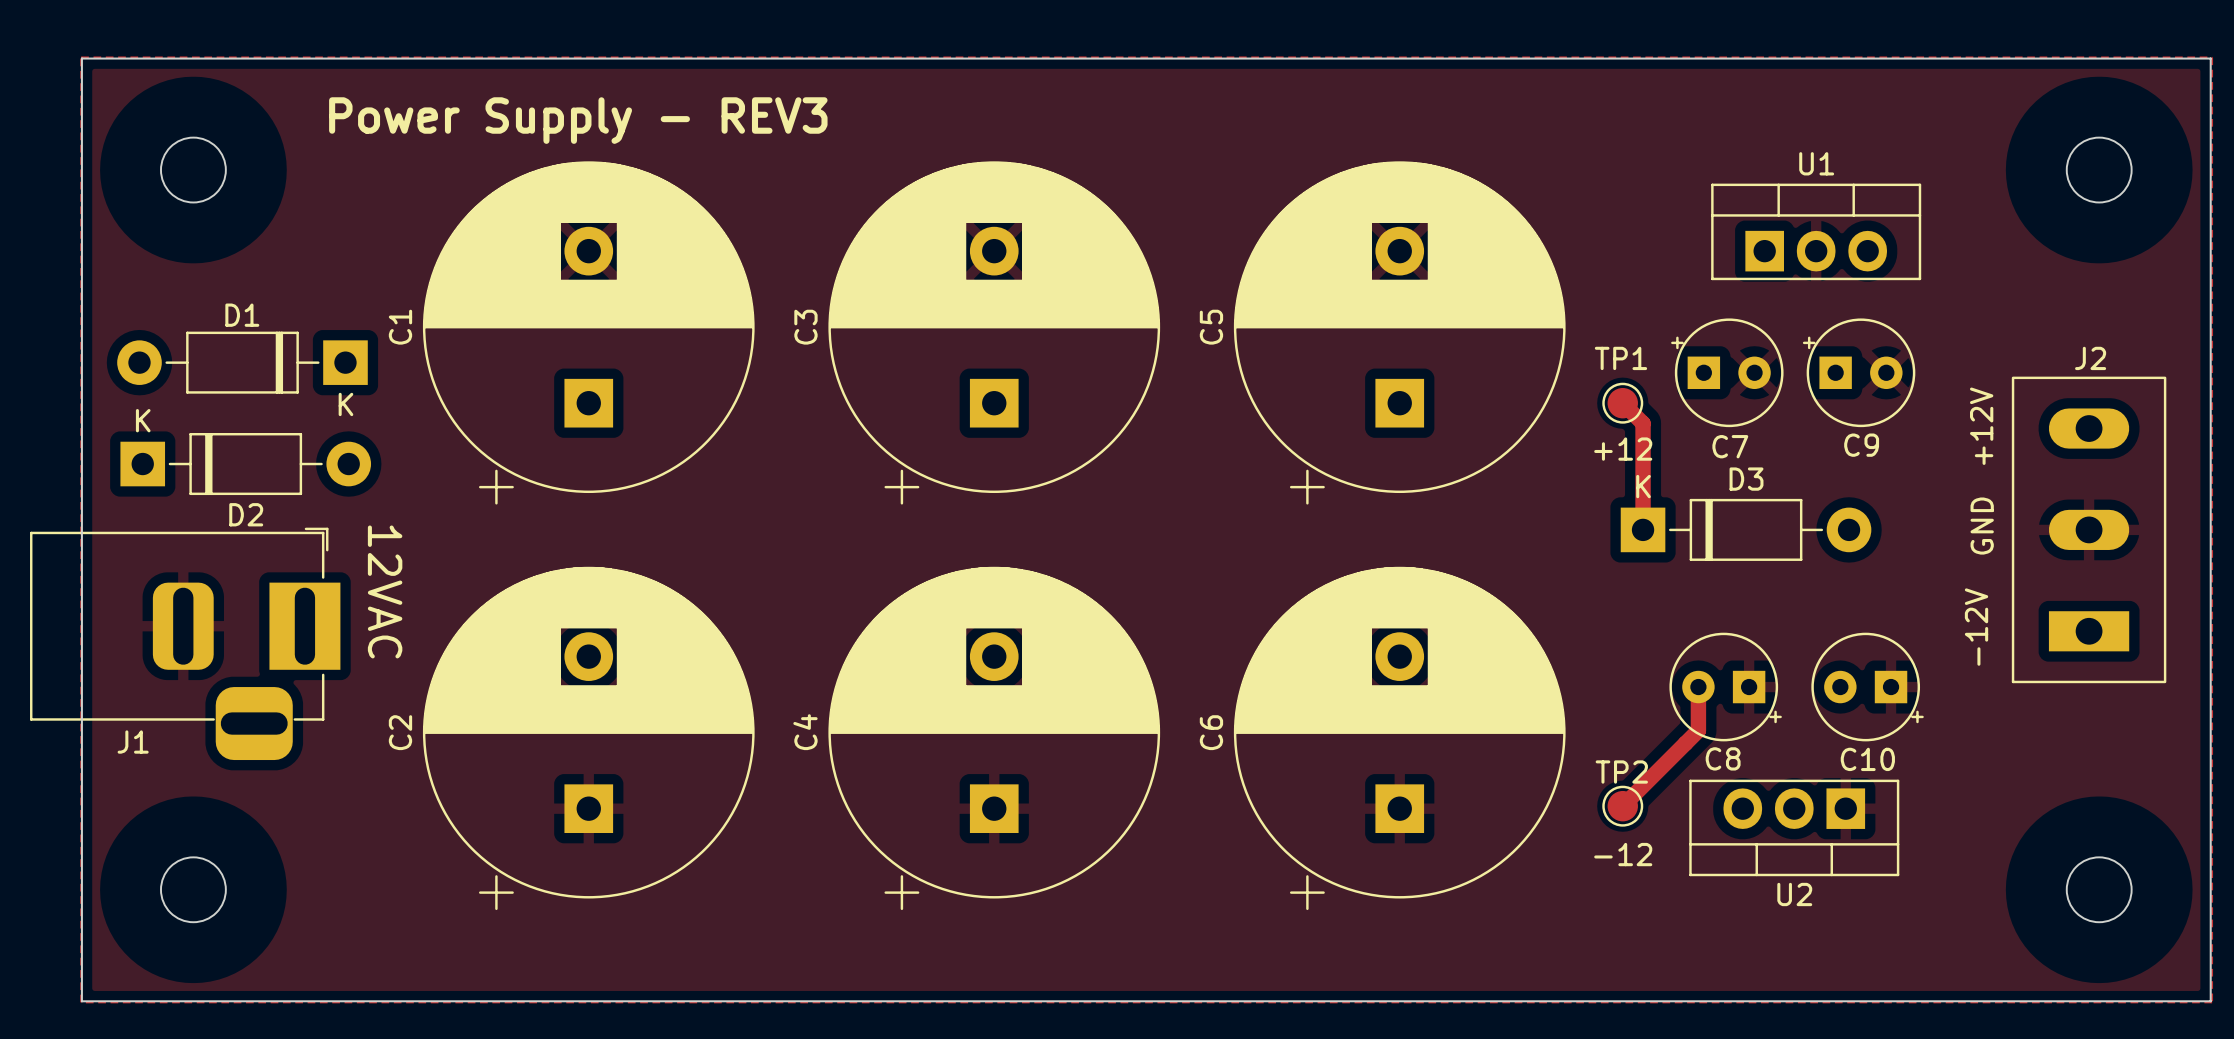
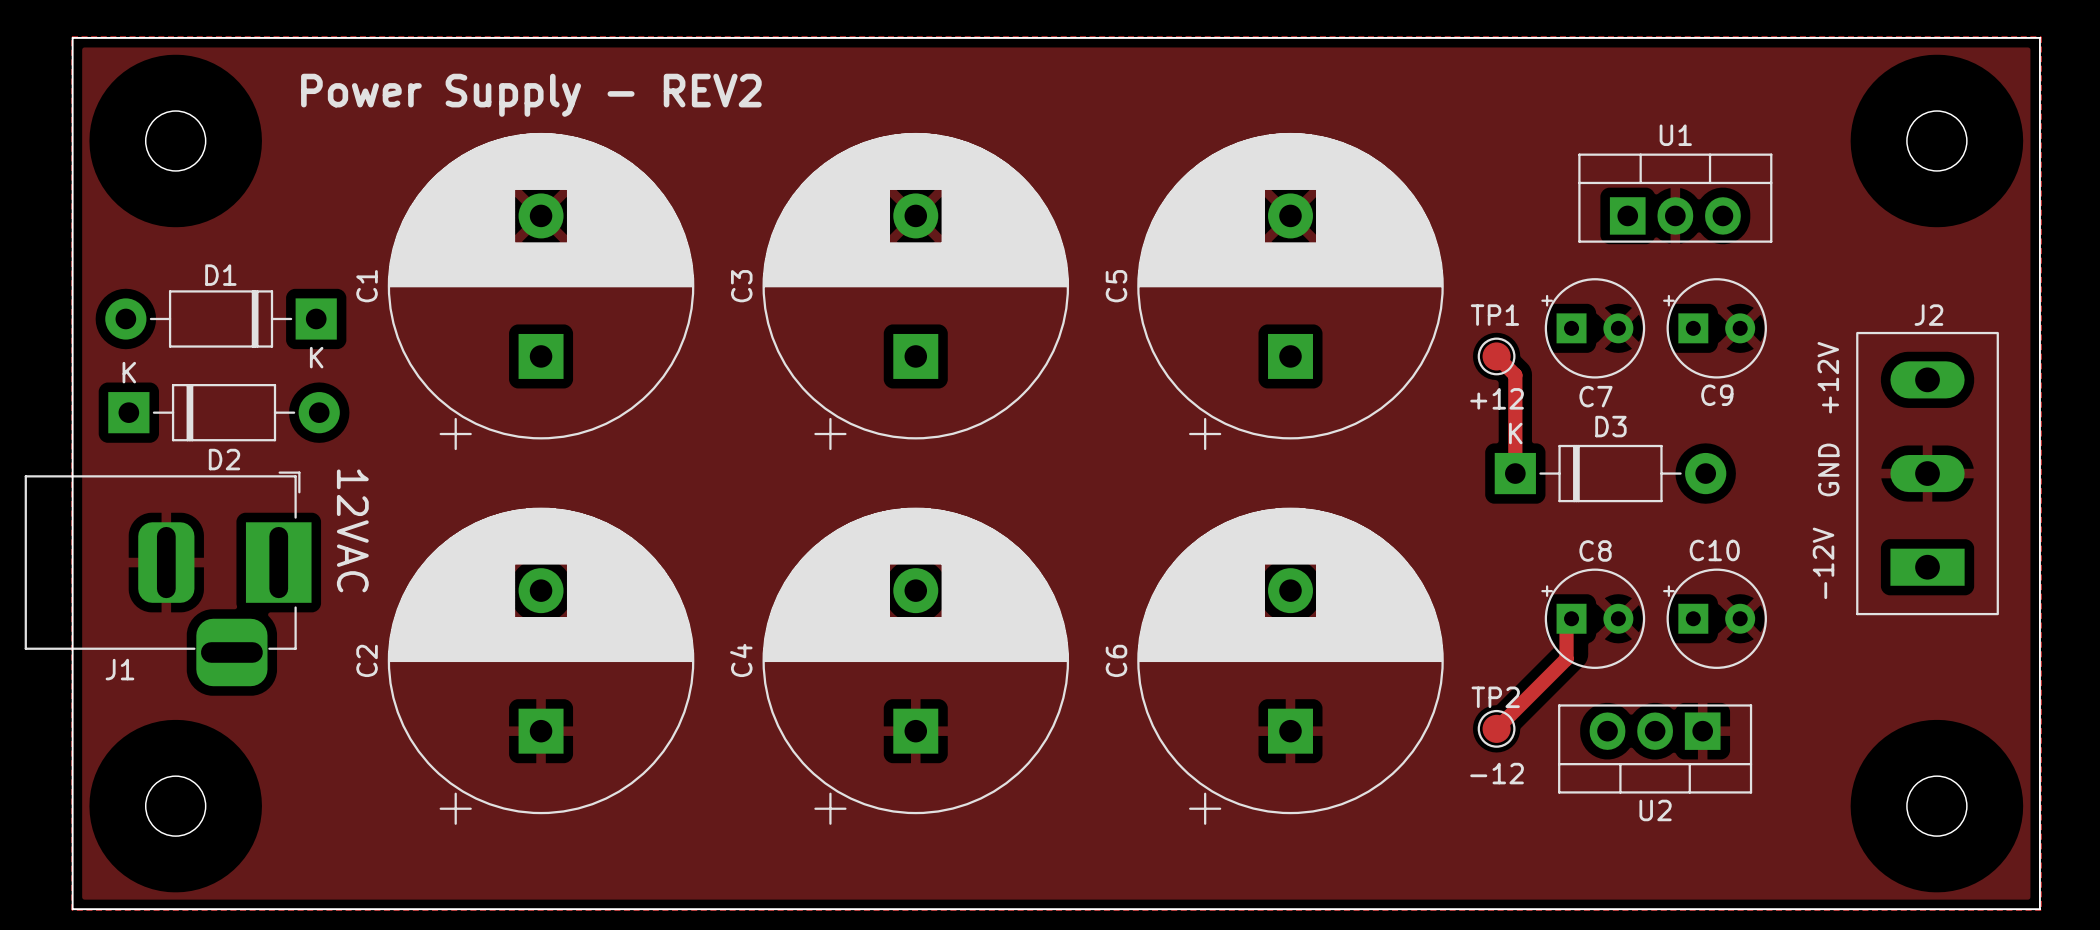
text: Power Supply - REV3 (578, 120) -> Power Supply - REV2 (531, 95)
C8 rotation: 0° (1725, 687) -> 180° (1593, 618)
C10 rotation: 0° (1867, 687) -> 180° (1715, 618)

